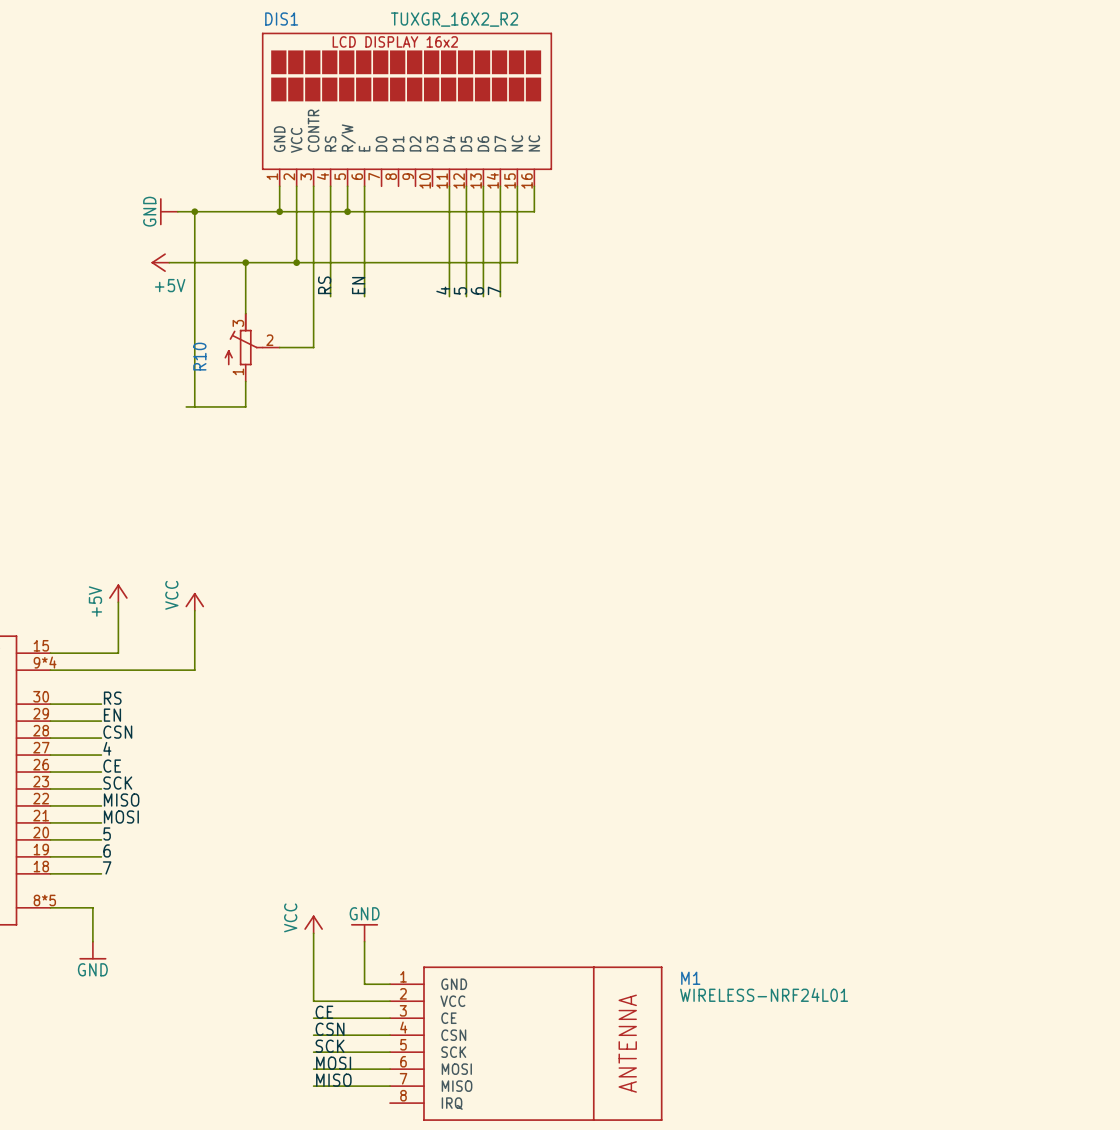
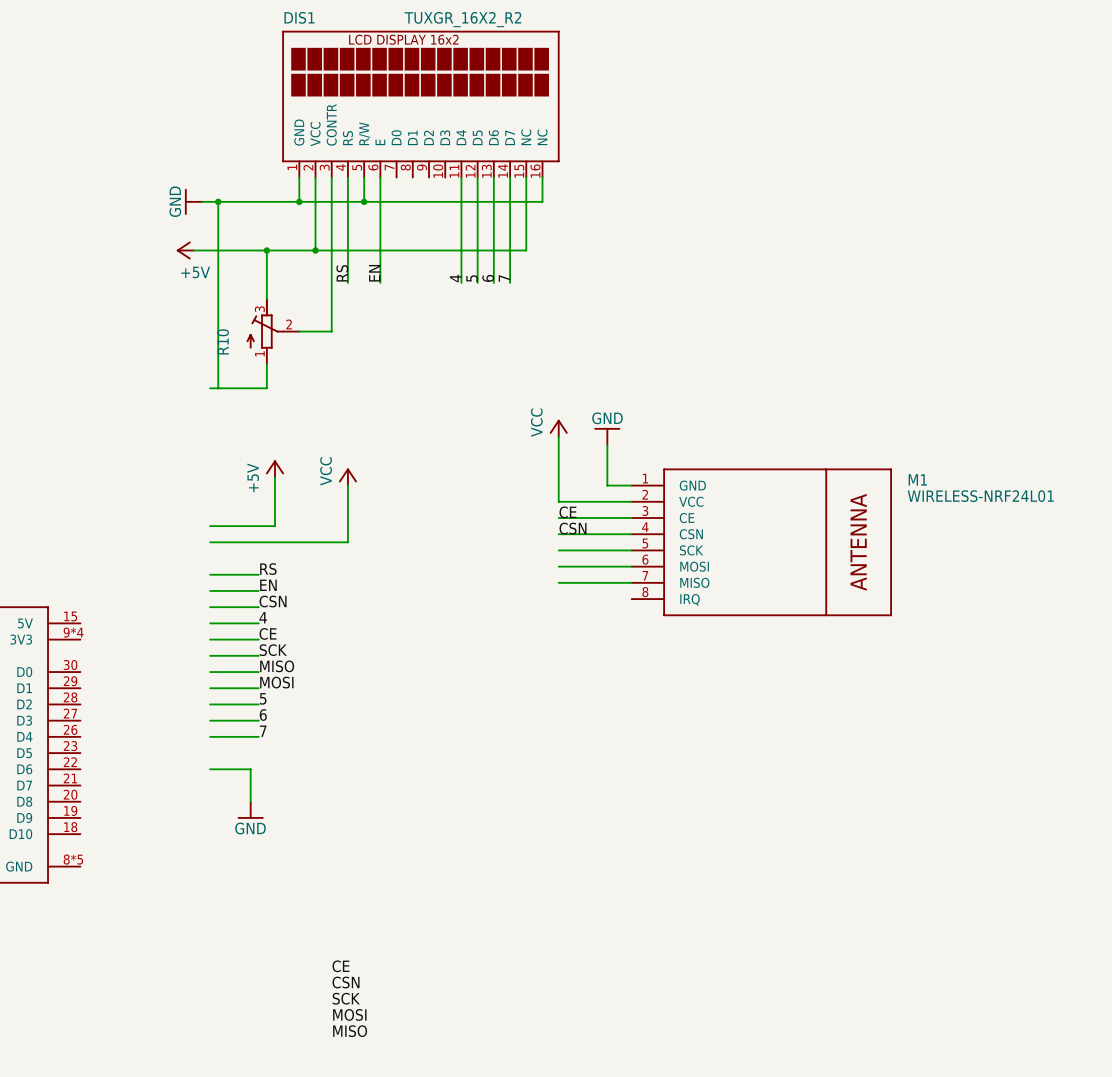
power symbol: none -> VCC (558, 428)
wire: none -> (558, 436) (558, 501) (631, 501)
power symbol: none -> GND (607, 436)
wire: none -> (607, 445) (607, 485) (631, 485)
power symbol: none -> +5V (274, 468)
power symbol: none -> VCC (347, 477)
wire: none -> (274, 477) (274, 526) (210, 526)
wire: none -> (347, 485) (347, 542) (210, 542)
label: none -> CE (567, 512)
wire: none -> (558, 518) (631, 518)
label: none -> CSN (572, 528)
wire: none -> (558, 534) (631, 534)
wire: none -> (558, 550) (631, 550)
power symbol: +5V (118, 593) -> none
wire: none -> (558, 566) (631, 566)
label: none -> RS (268, 569)
power symbol: VCC (194, 601) -> none
wire: (118, 602) (118, 653) (50, 653) -> none
wire: none -> (210, 574) (258, 574)
wire: (194, 610) (194, 670) -> (258, 639) (218, 639)
wire: none -> (558, 582) (631, 582)
label: none -> EN (268, 585)
label: none -> CSN (273, 601)
label: none -> 4 (263, 617)
label: none -> CE (268, 633)
wire: (50, 670) (186, 670) -> none
label: none -> SCK (273, 650)
label: RS (112, 698) -> none
label: none -> MISO (277, 666)
wire: (50, 704) (101, 704) -> (210, 590) (258, 590)
label: EN (112, 715) -> none
label: none -> MOSI (276, 682)
wire: (50, 721) (101, 721) -> (210, 607) (258, 607)
label: CSN (117, 732) -> none
label: none -> 5 (263, 698)
wire: (50, 738) (101, 738) -> (210, 623) (258, 623)
label: 4 (107, 748) -> none
label: none -> 6 (263, 715)
wire: (50, 755) (101, 755) -> none
label: CE (112, 766) -> none
label: none -> 7 (263, 731)
wire: (50, 772) (101, 772) -> (210, 655) (258, 655)
label: SCK (117, 783) -> none
wire: (50, 788) (101, 788) -> (210, 672) (258, 672)
label: MISO (121, 800) -> none
wire: (50, 805) (101, 805) -> (210, 688) (258, 688)
wire: none -> (210, 769) (250, 769) (250, 801)
label: MOSI (121, 817) -> none
wire: (50, 822) (101, 822) -> (210, 704) (258, 704)
label: 5 (107, 833) -> none
wire: (50, 839) (101, 839) -> (210, 720) (258, 720)
power symbol: none -> GND (250, 810)
label: 6 (107, 850) -> none
wire: (50, 856) (101, 856) -> (210, 736) (258, 736)
label: 7 (107, 867) -> none
wire: (50, 873) (101, 873) -> none
wire: (50, 907) (92, 907) (92, 941) -> none
power symbol: VCC (313, 924) -> none
power symbol: GND (364, 932) -> none
wire: (313, 933) (313, 1001) (390, 1001) -> none
wire: (364, 941) (364, 984) (390, 984) -> none
power symbol: GND (92, 950) -> none
wire: (313, 1018) (390, 1018) -> none
wire: (313, 1035) (390, 1035) -> none
M1 position: (526, 1043) -> (761, 542)
wire: (313, 1052) (390, 1052) -> none
wire: (313, 1069) (390, 1069) -> none
wire: (313, 1086) (390, 1086) -> none

